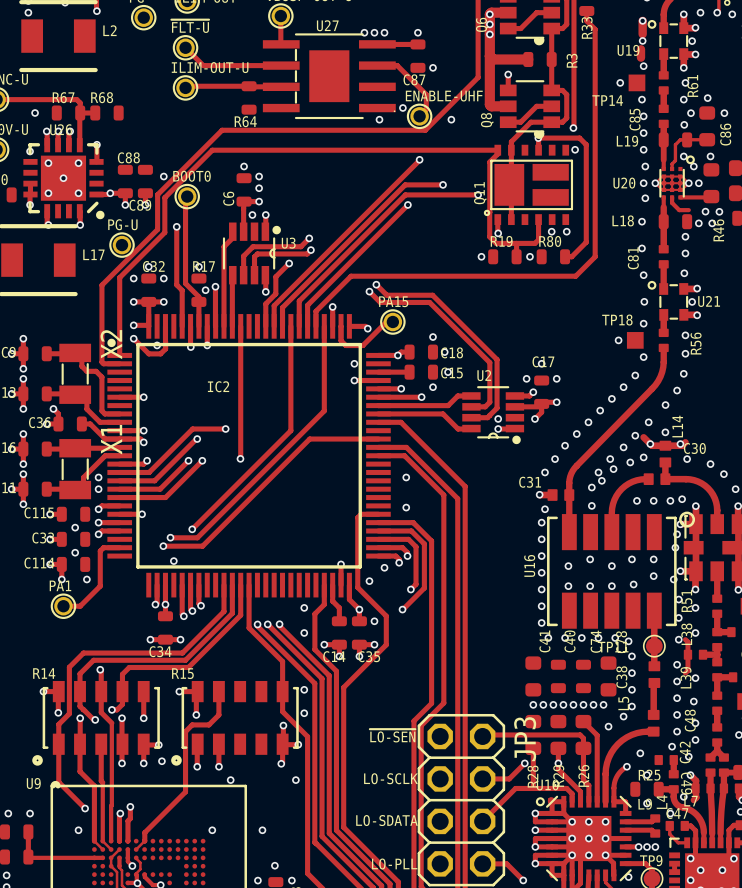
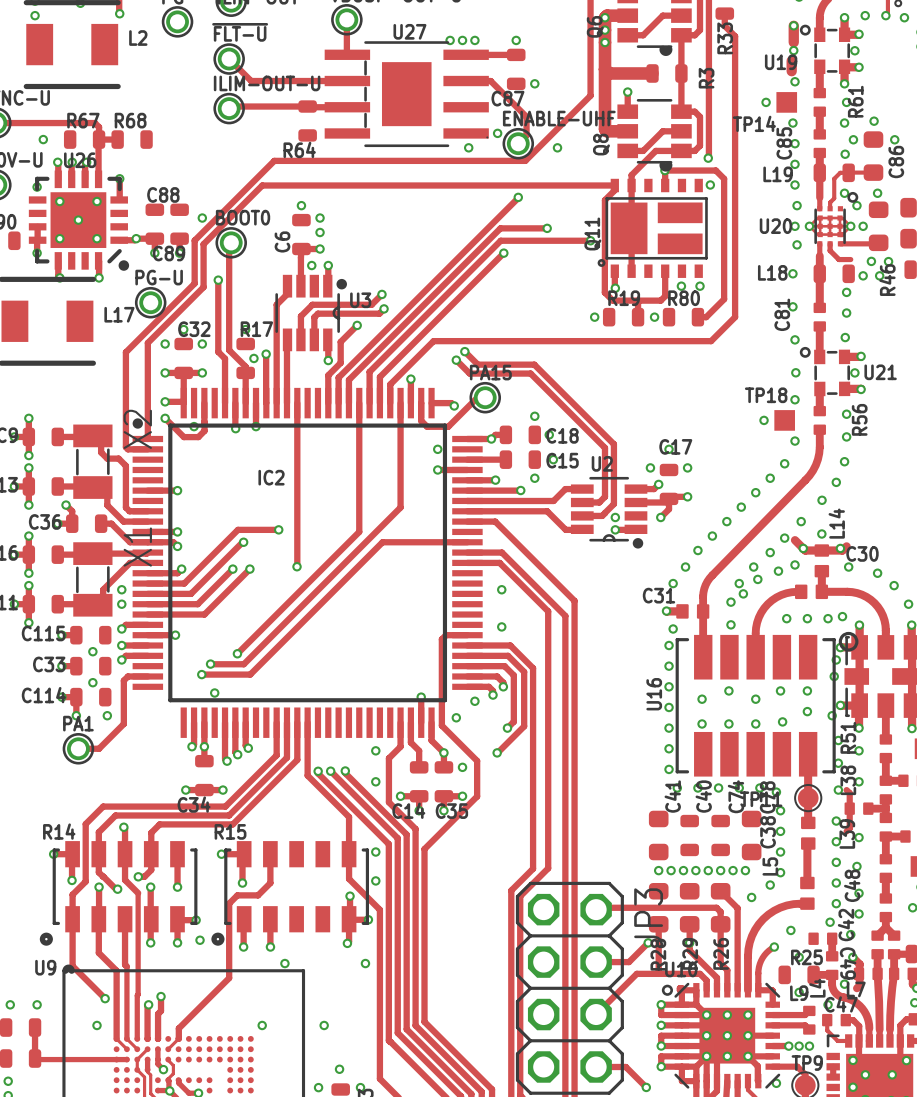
text: ~{LO-SEN} (392, 735) -> none
text: LO-SCLK (390, 778) -> none
text: LO-SDATA (386, 820) -> none
text: LO-PLL (394, 864) -> none

